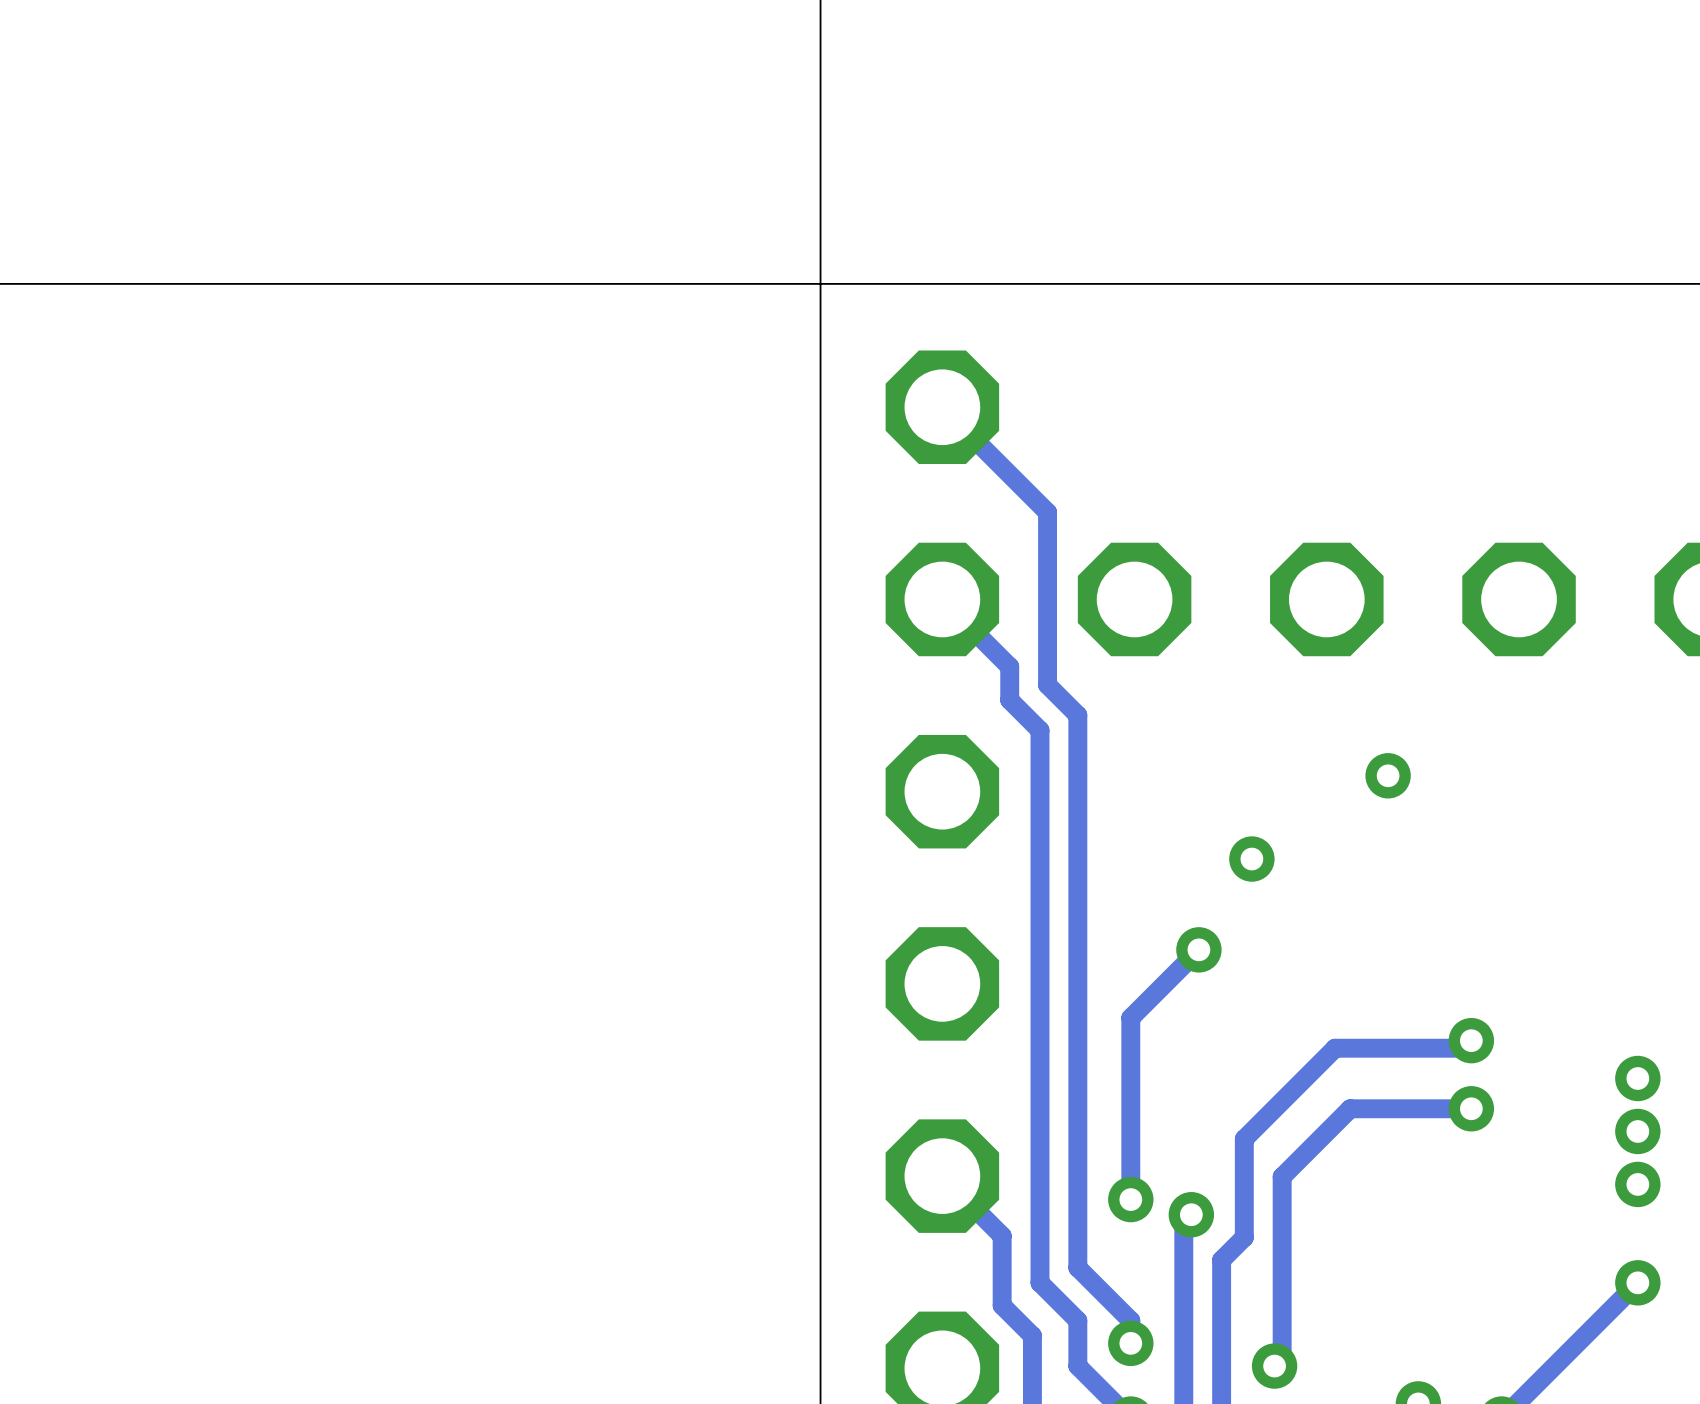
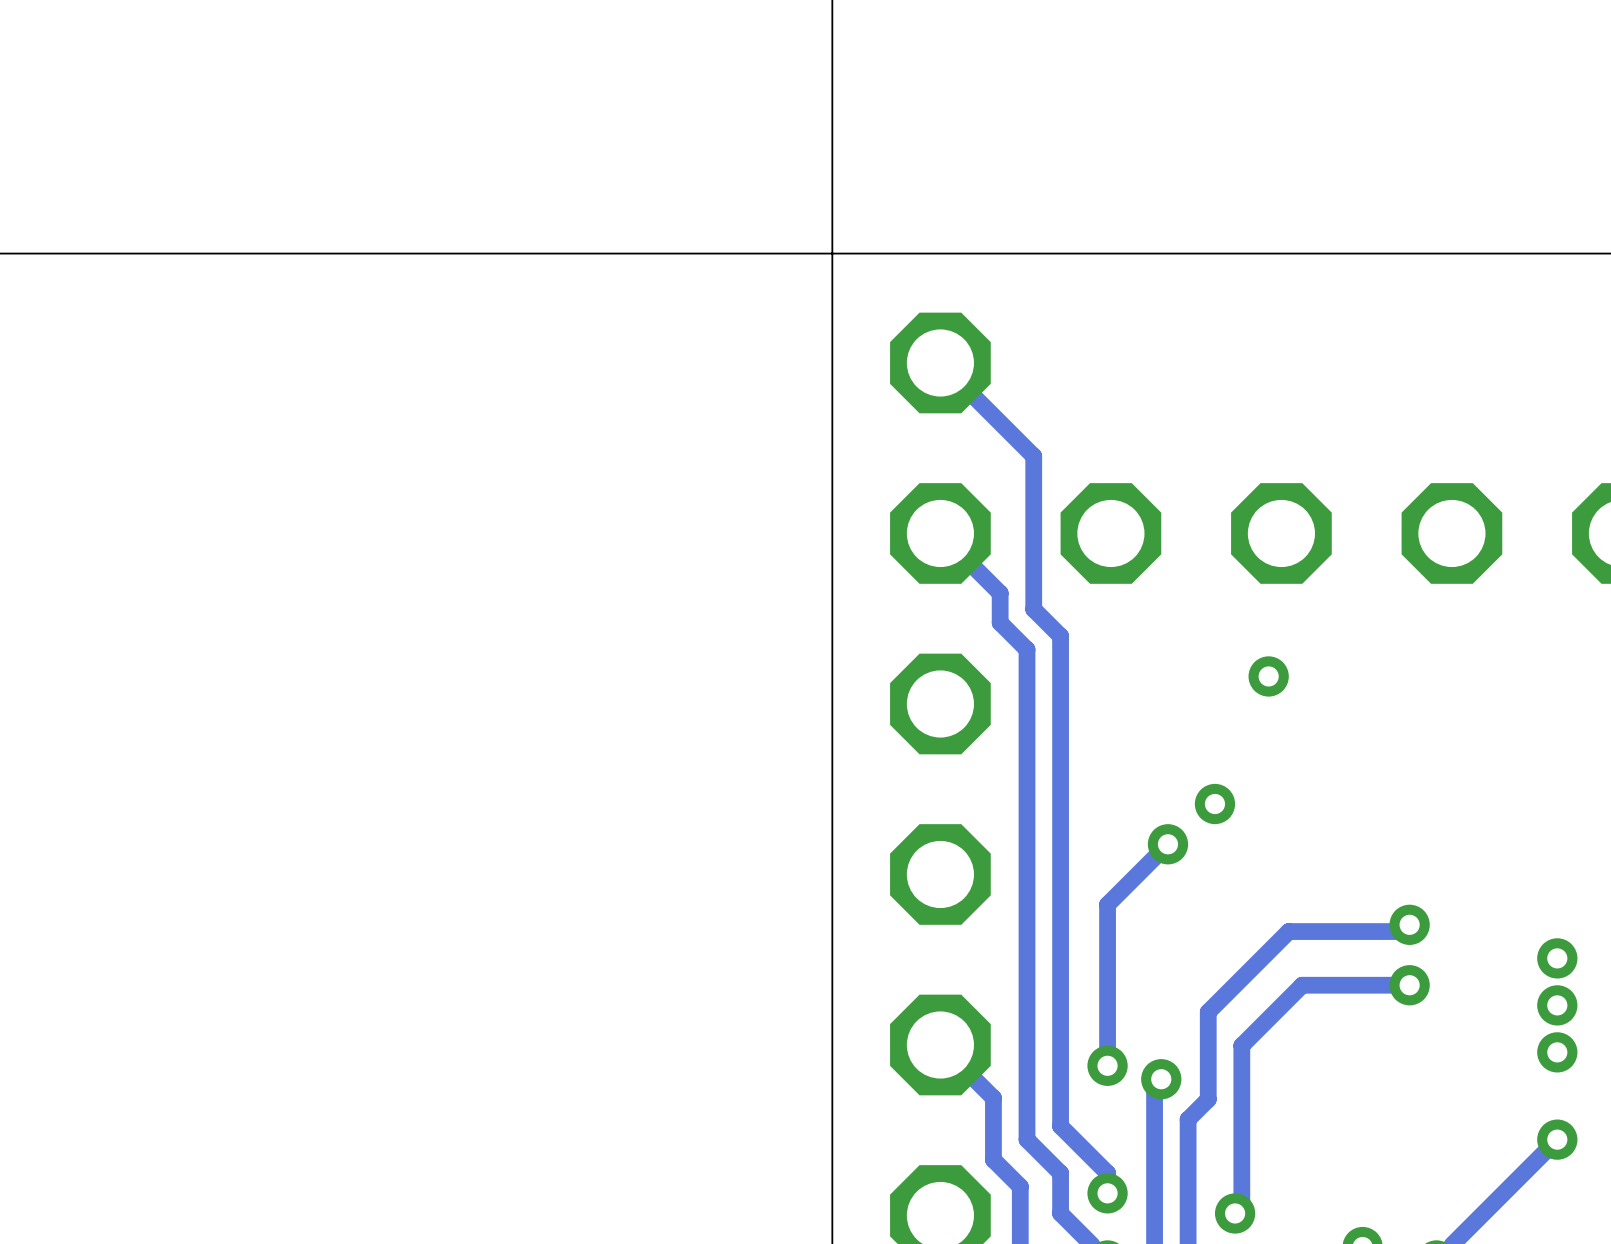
via: none -> (1268, 676)
via: (1388, 775) -> none
via position: (1251, 859) -> (1214, 804)

